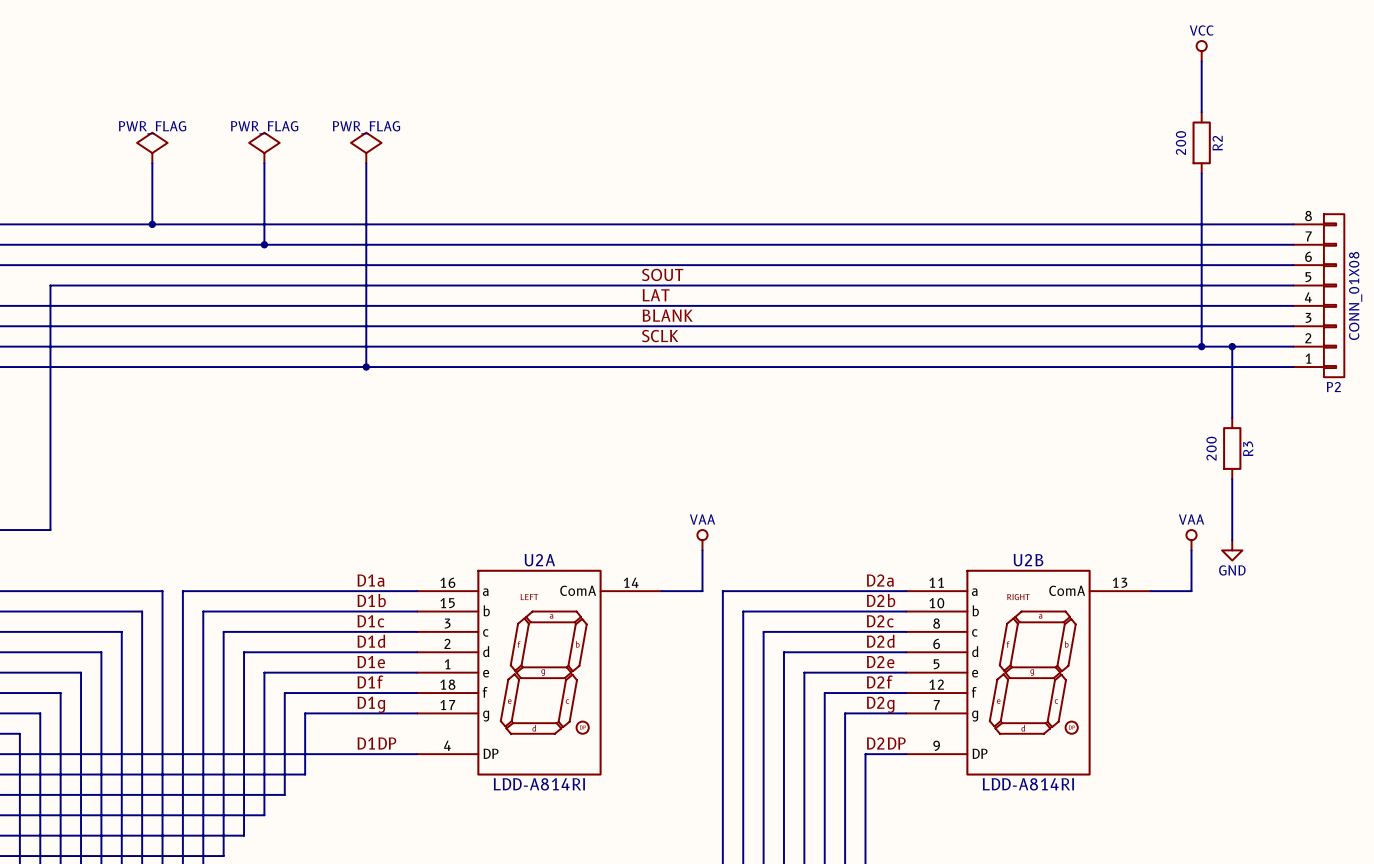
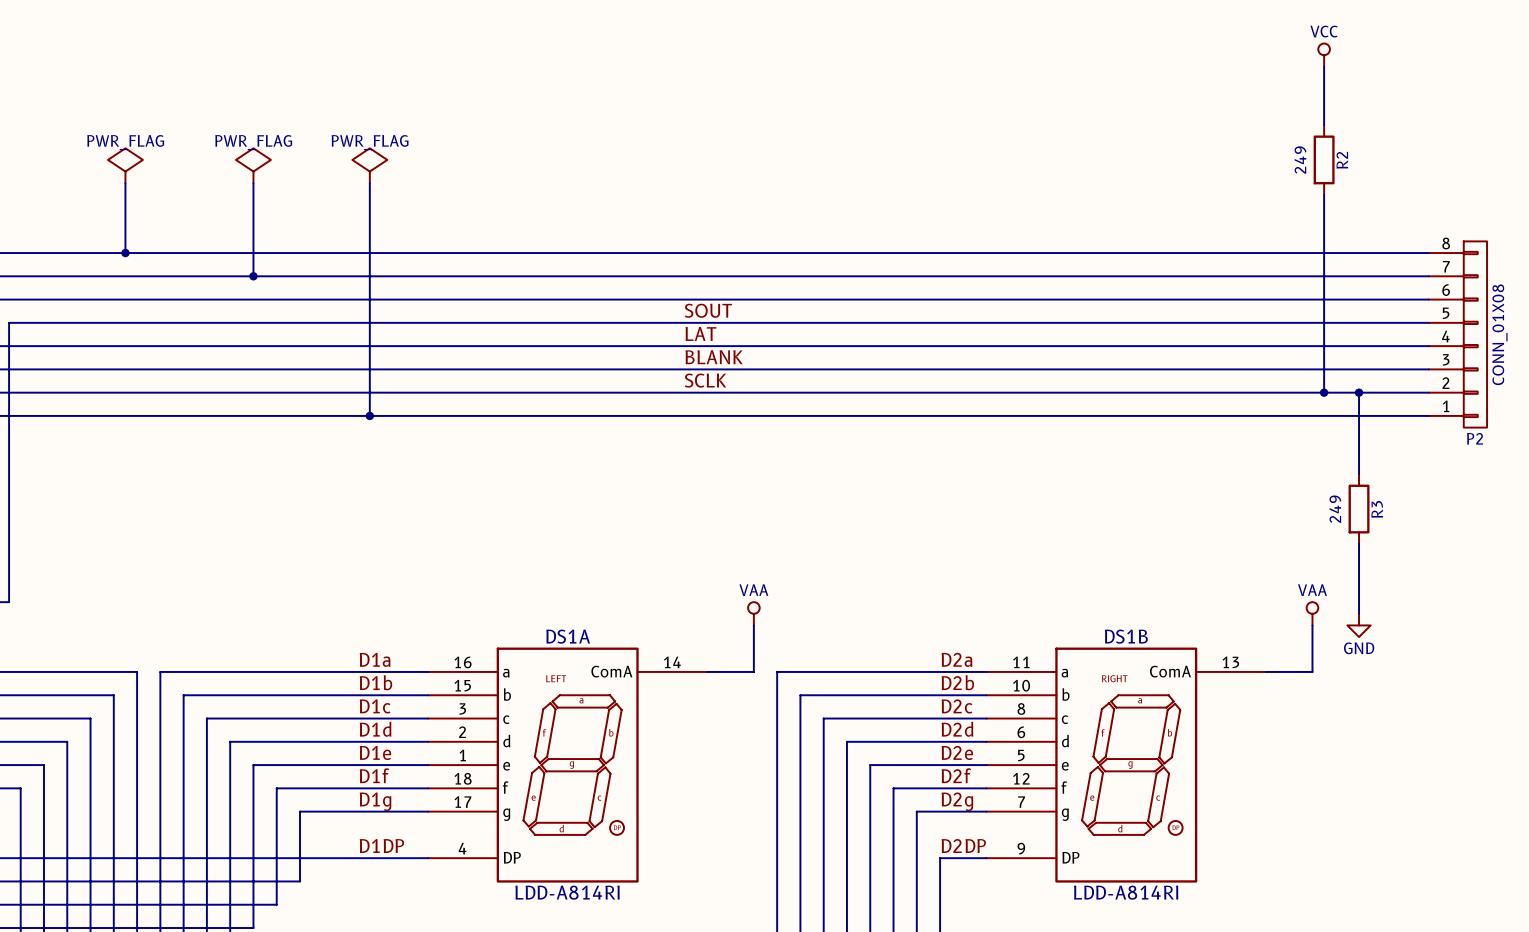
R2 value: 200 (1181, 143) -> 249 (1300, 160)
R3 value: 200 (1211, 448) -> 249 (1335, 509)
U2A name: U2A (539, 560) -> DS1A (568, 636)
U2B name: U2B (1028, 560) -> DS1B (1126, 636)

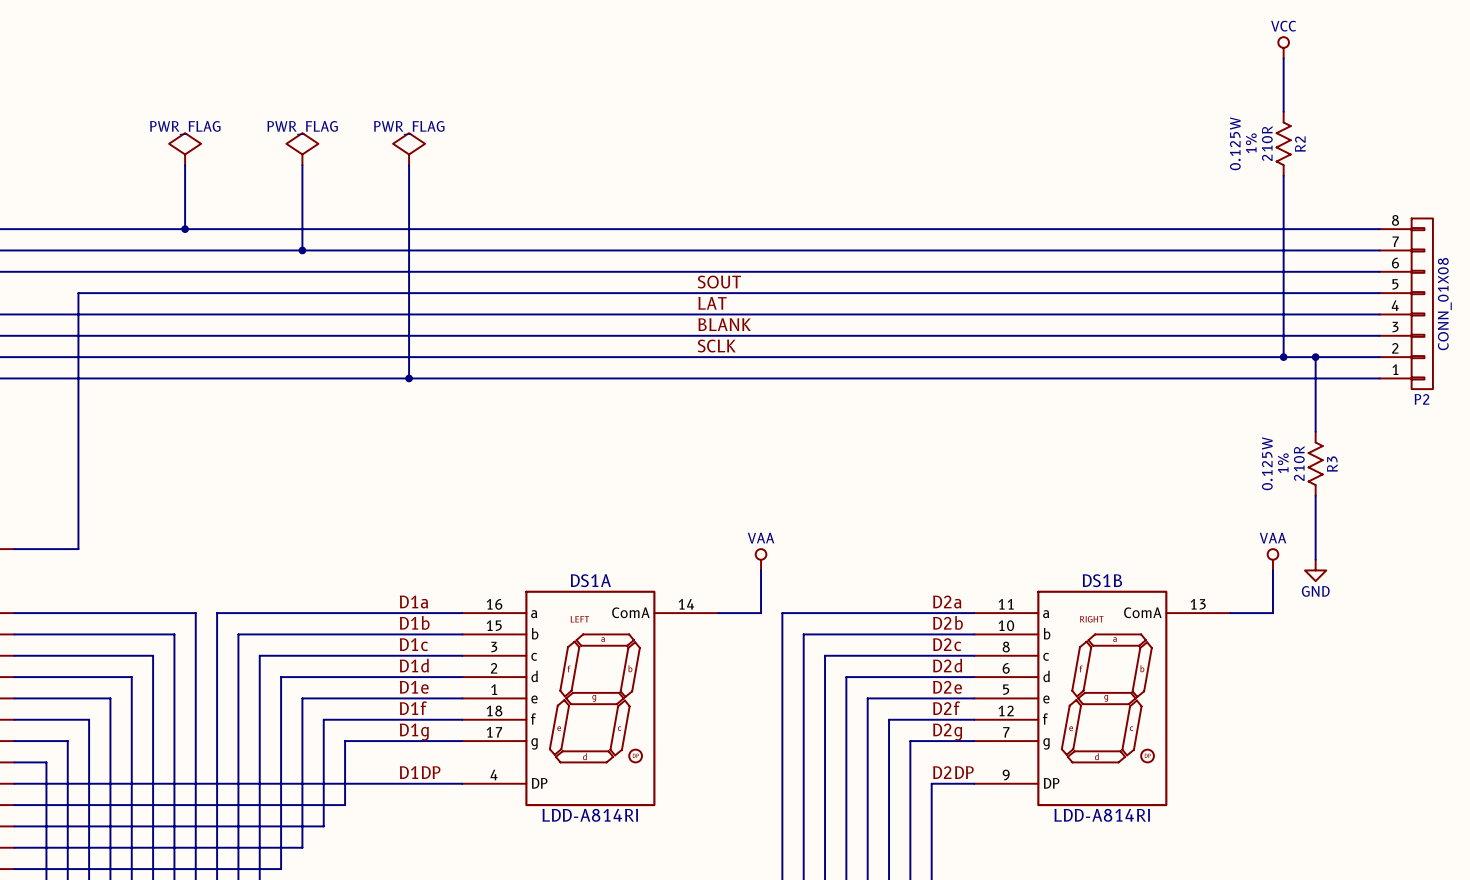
R2 symbol: [1313, 125, 1335, 195] -> [1275, 111, 1292, 176]
R2 text: none -> 0.125W (1235, 143)
R2 text: none -> 1% (1251, 143)
R2 value: 249 (1300, 160) -> 210R (1267, 143)
R3 symbol: [1348, 474, 1370, 544] -> [1307, 431, 1324, 496]
R3 text: none -> 1% (1283, 463)
R3 text: none -> 0.125W (1267, 463)
R3 value: 249 (1335, 509) -> 210R (1299, 463)

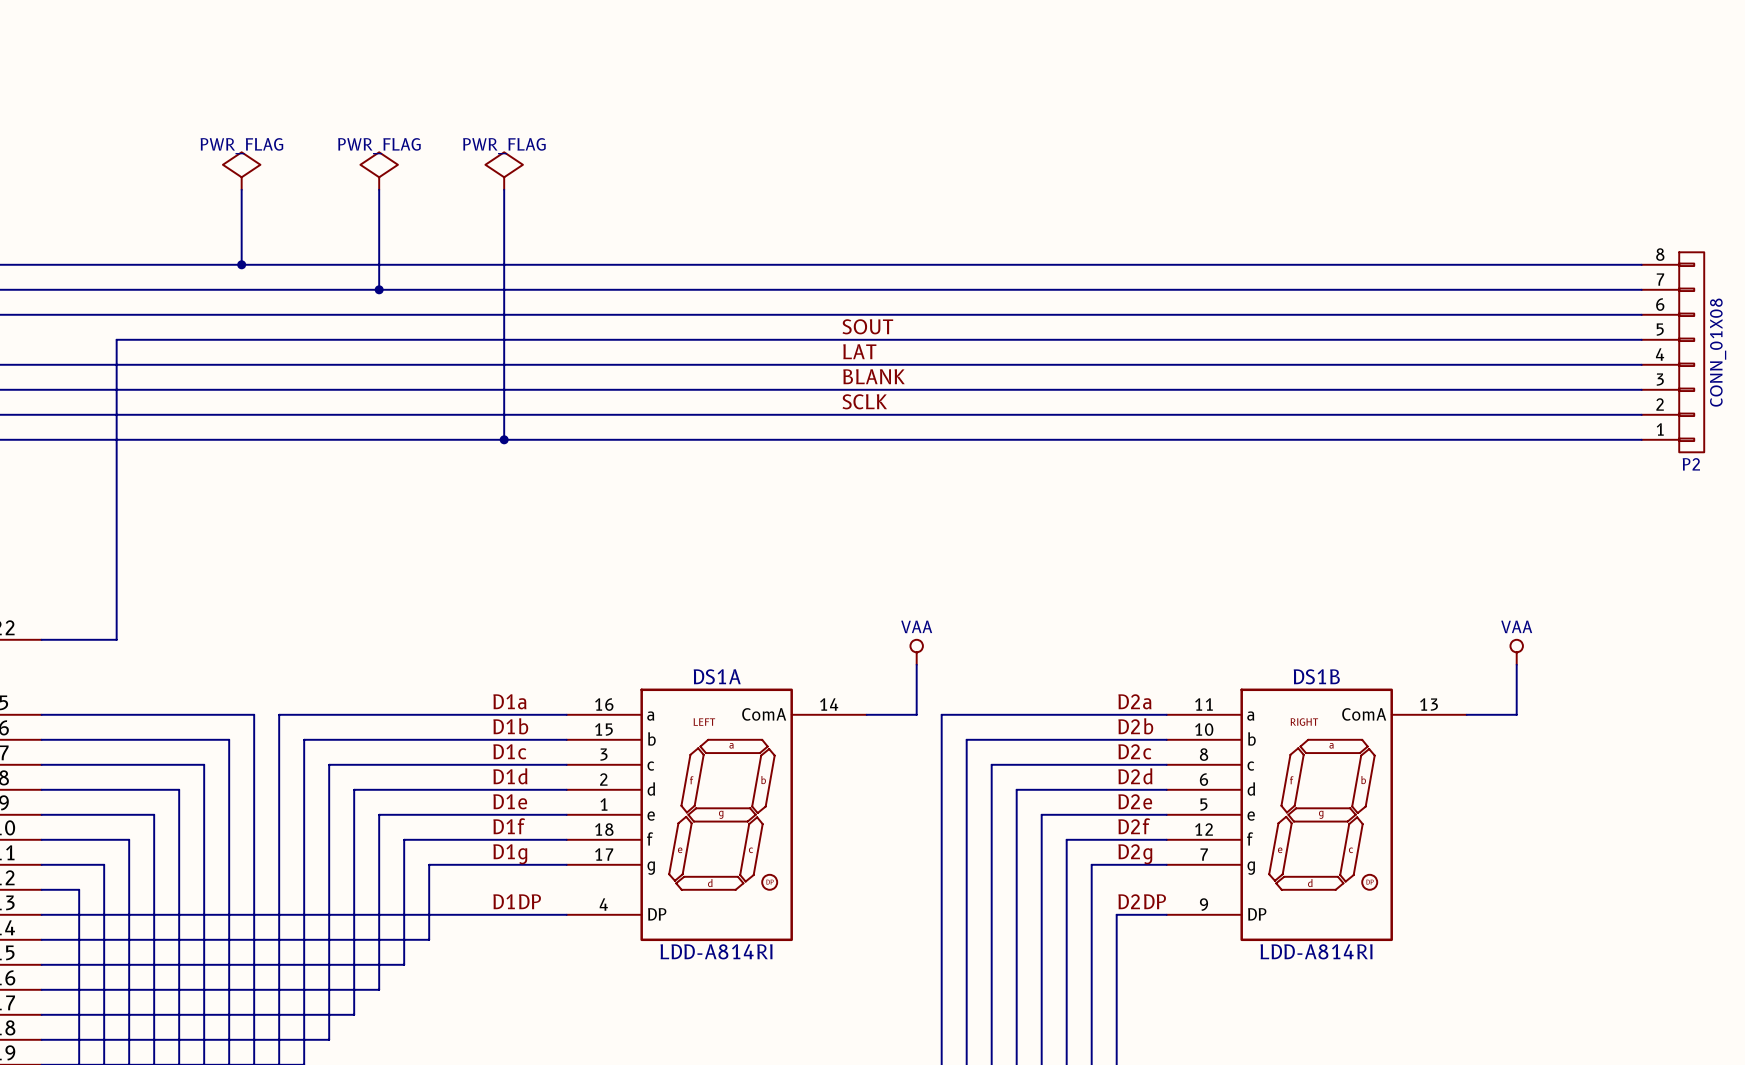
power symbol: VCC (1283, 47) -> none
wire: (1283, 58) (1283, 111) -> none
R2: 210R (1283, 143) -> none
wire: (1283, 175) (1283, 357) -> none
junction: (1283, 357) -> none
wire: (1315, 357) (1315, 431) -> none
junction: (1315, 357) -> none
R3: 210R (1315, 463) -> none
wire: (1315, 495) (1315, 559) -> none
power symbol: GND (1315, 570) -> none

